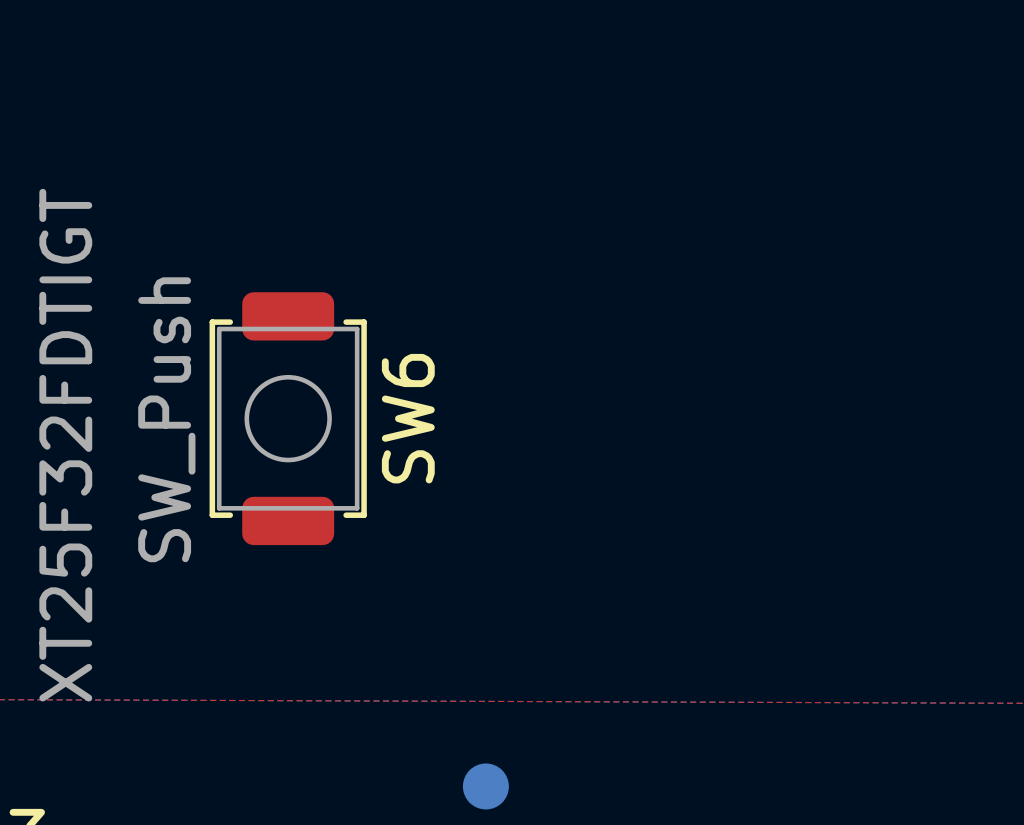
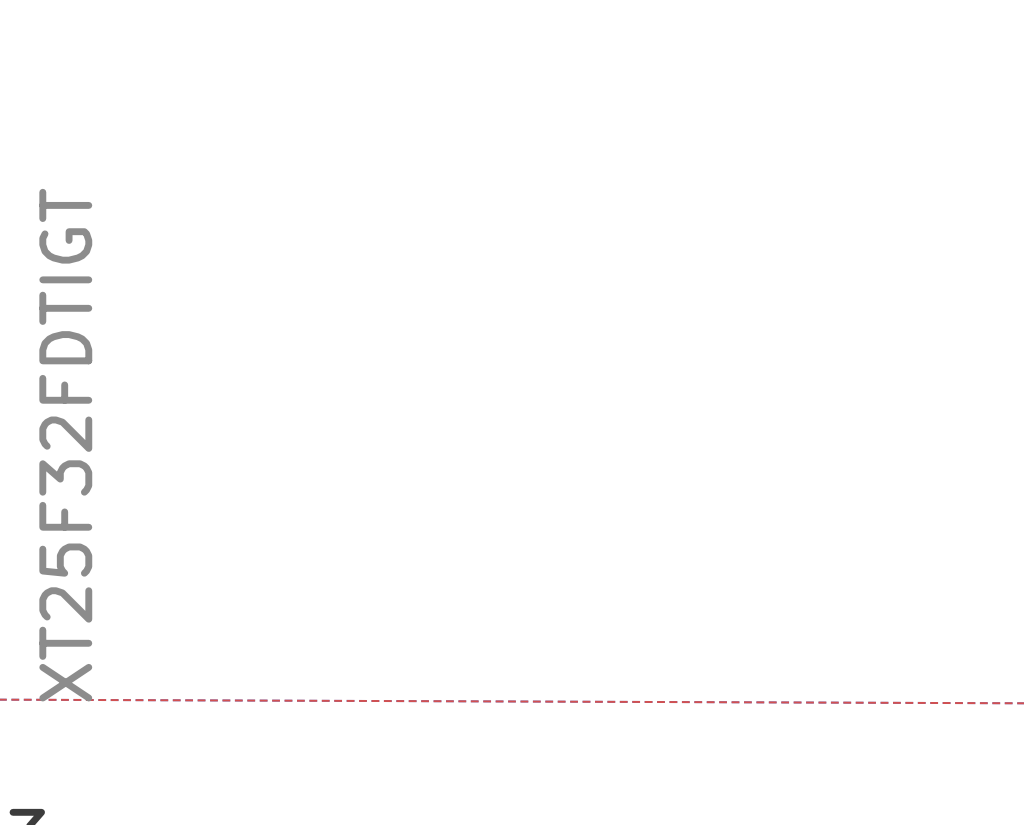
SW6: SW_Push (288, 418) -> none
part: (485, 786) -> none

